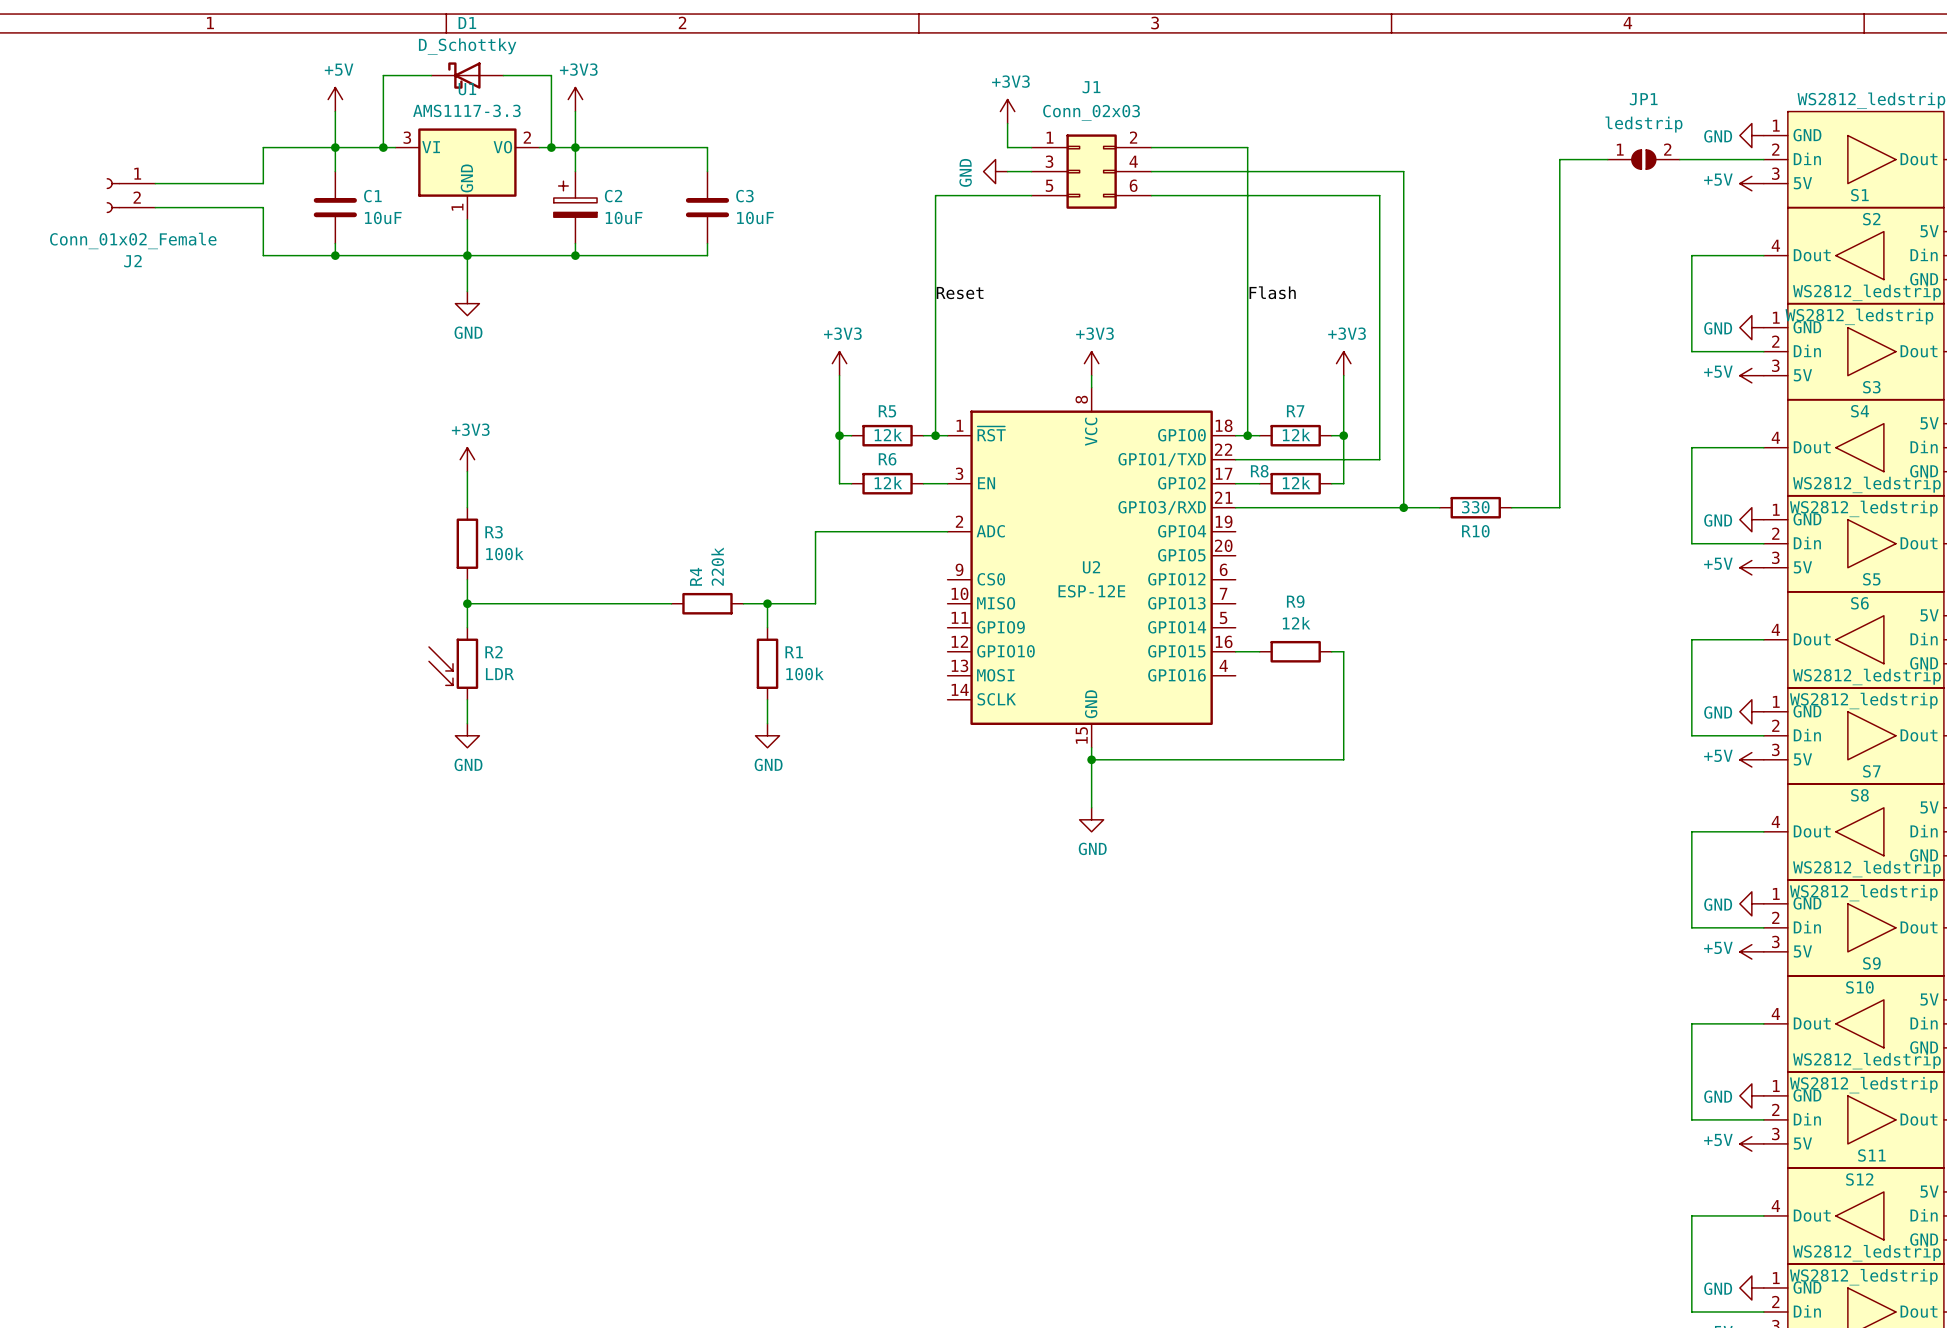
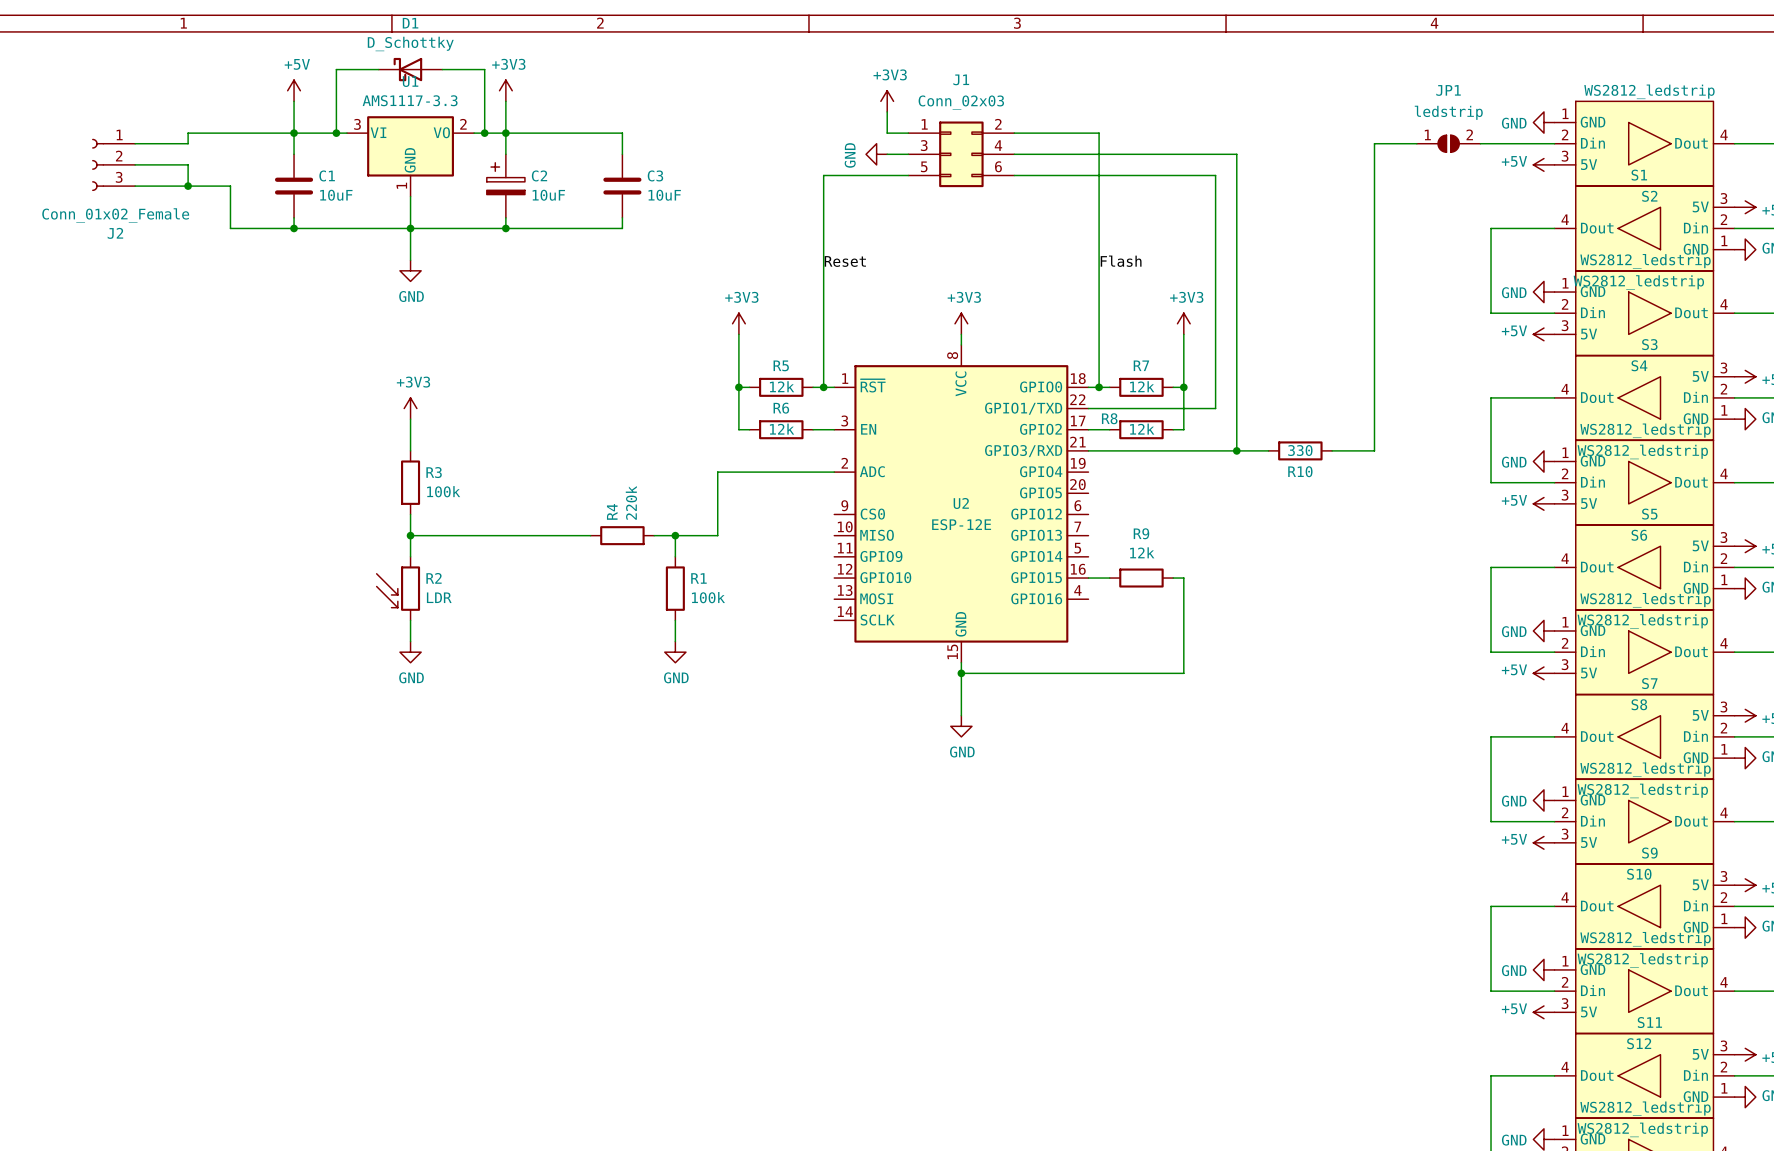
wire: (263, 147) (263, 183) (215, 183) -> (230, 133) (188, 133) (188, 143) (135, 143)
J2 symbol: [106, 178, 156, 214] -> [92, 138, 136, 191]
wire: none -> (188, 164) (188, 186)
junction: none -> (188, 186)

